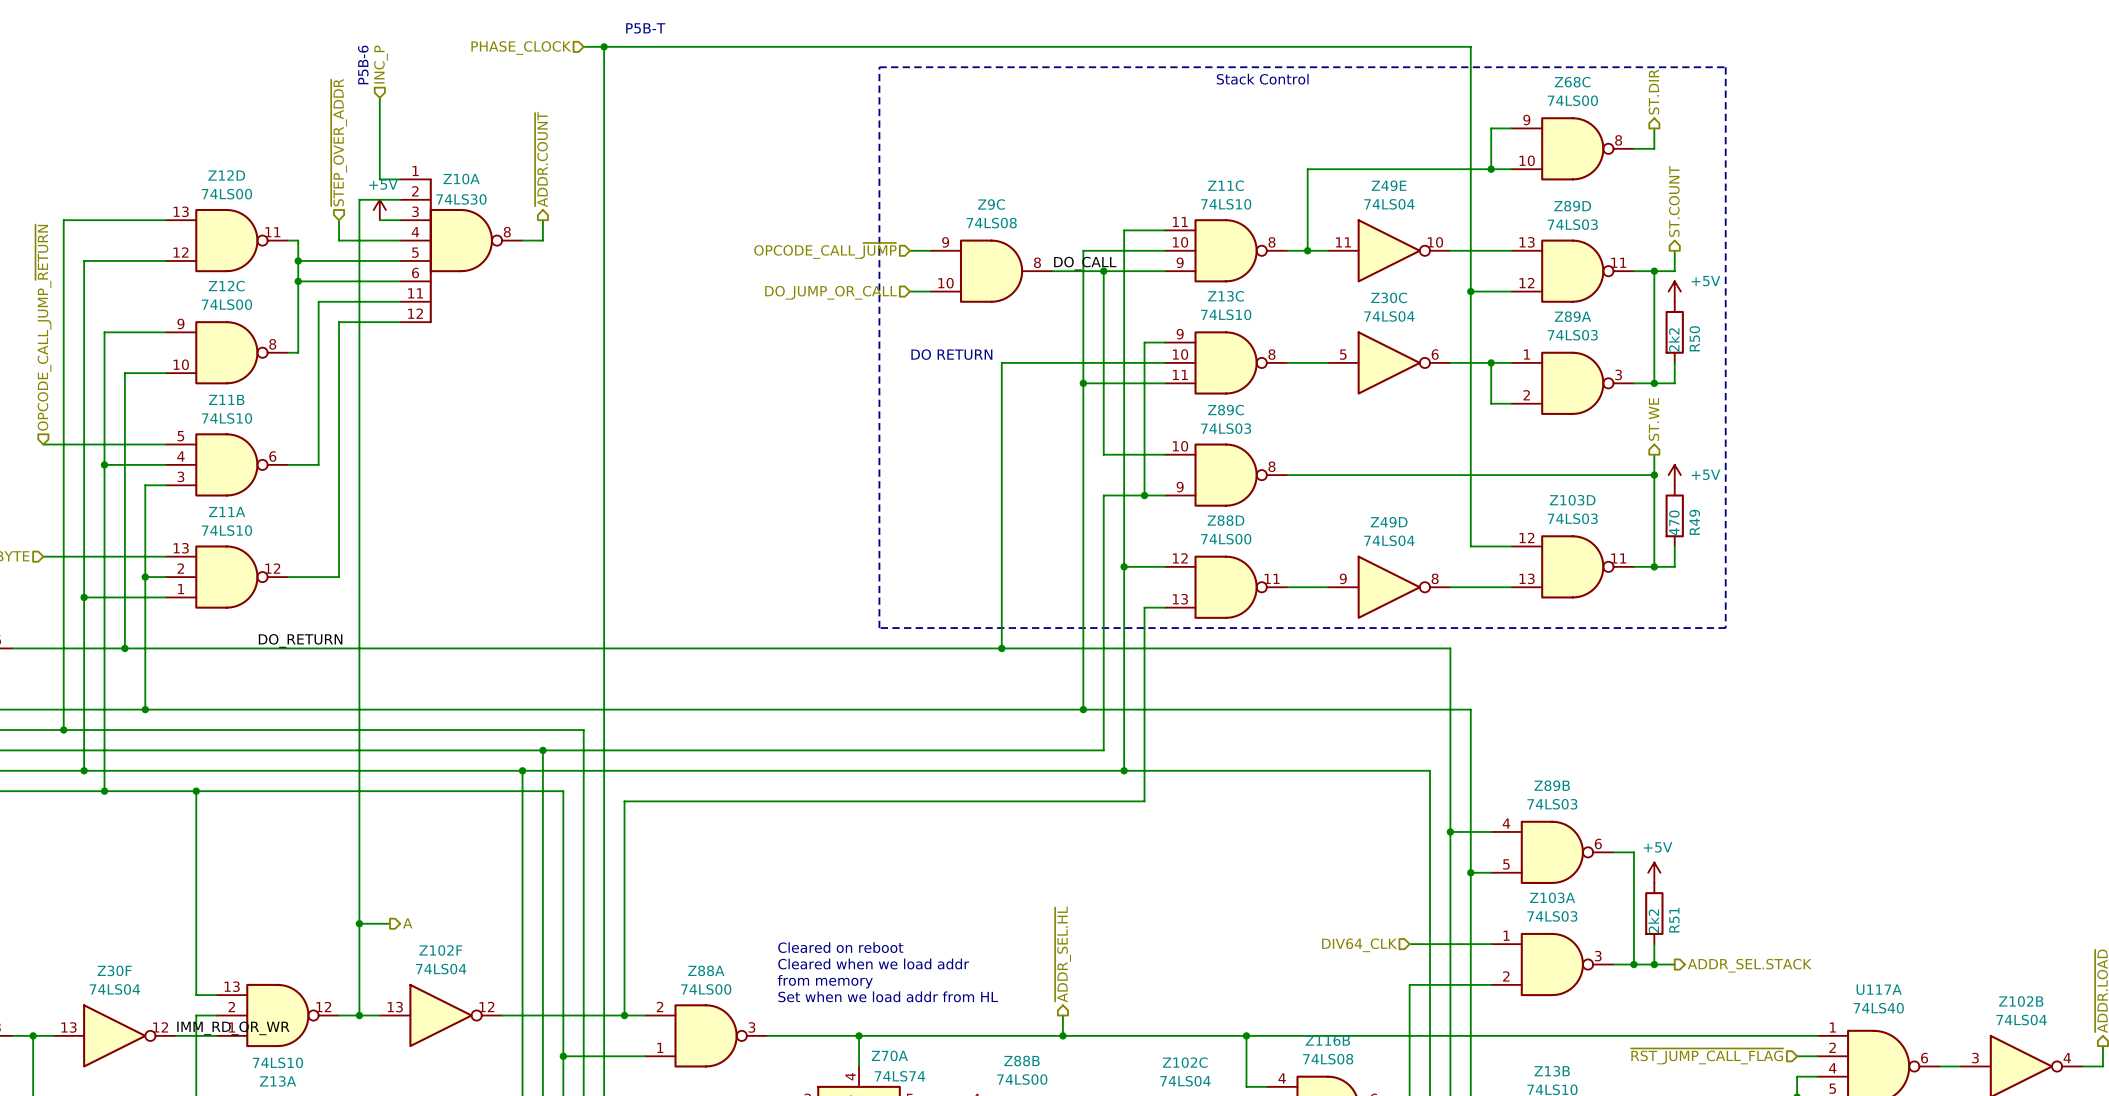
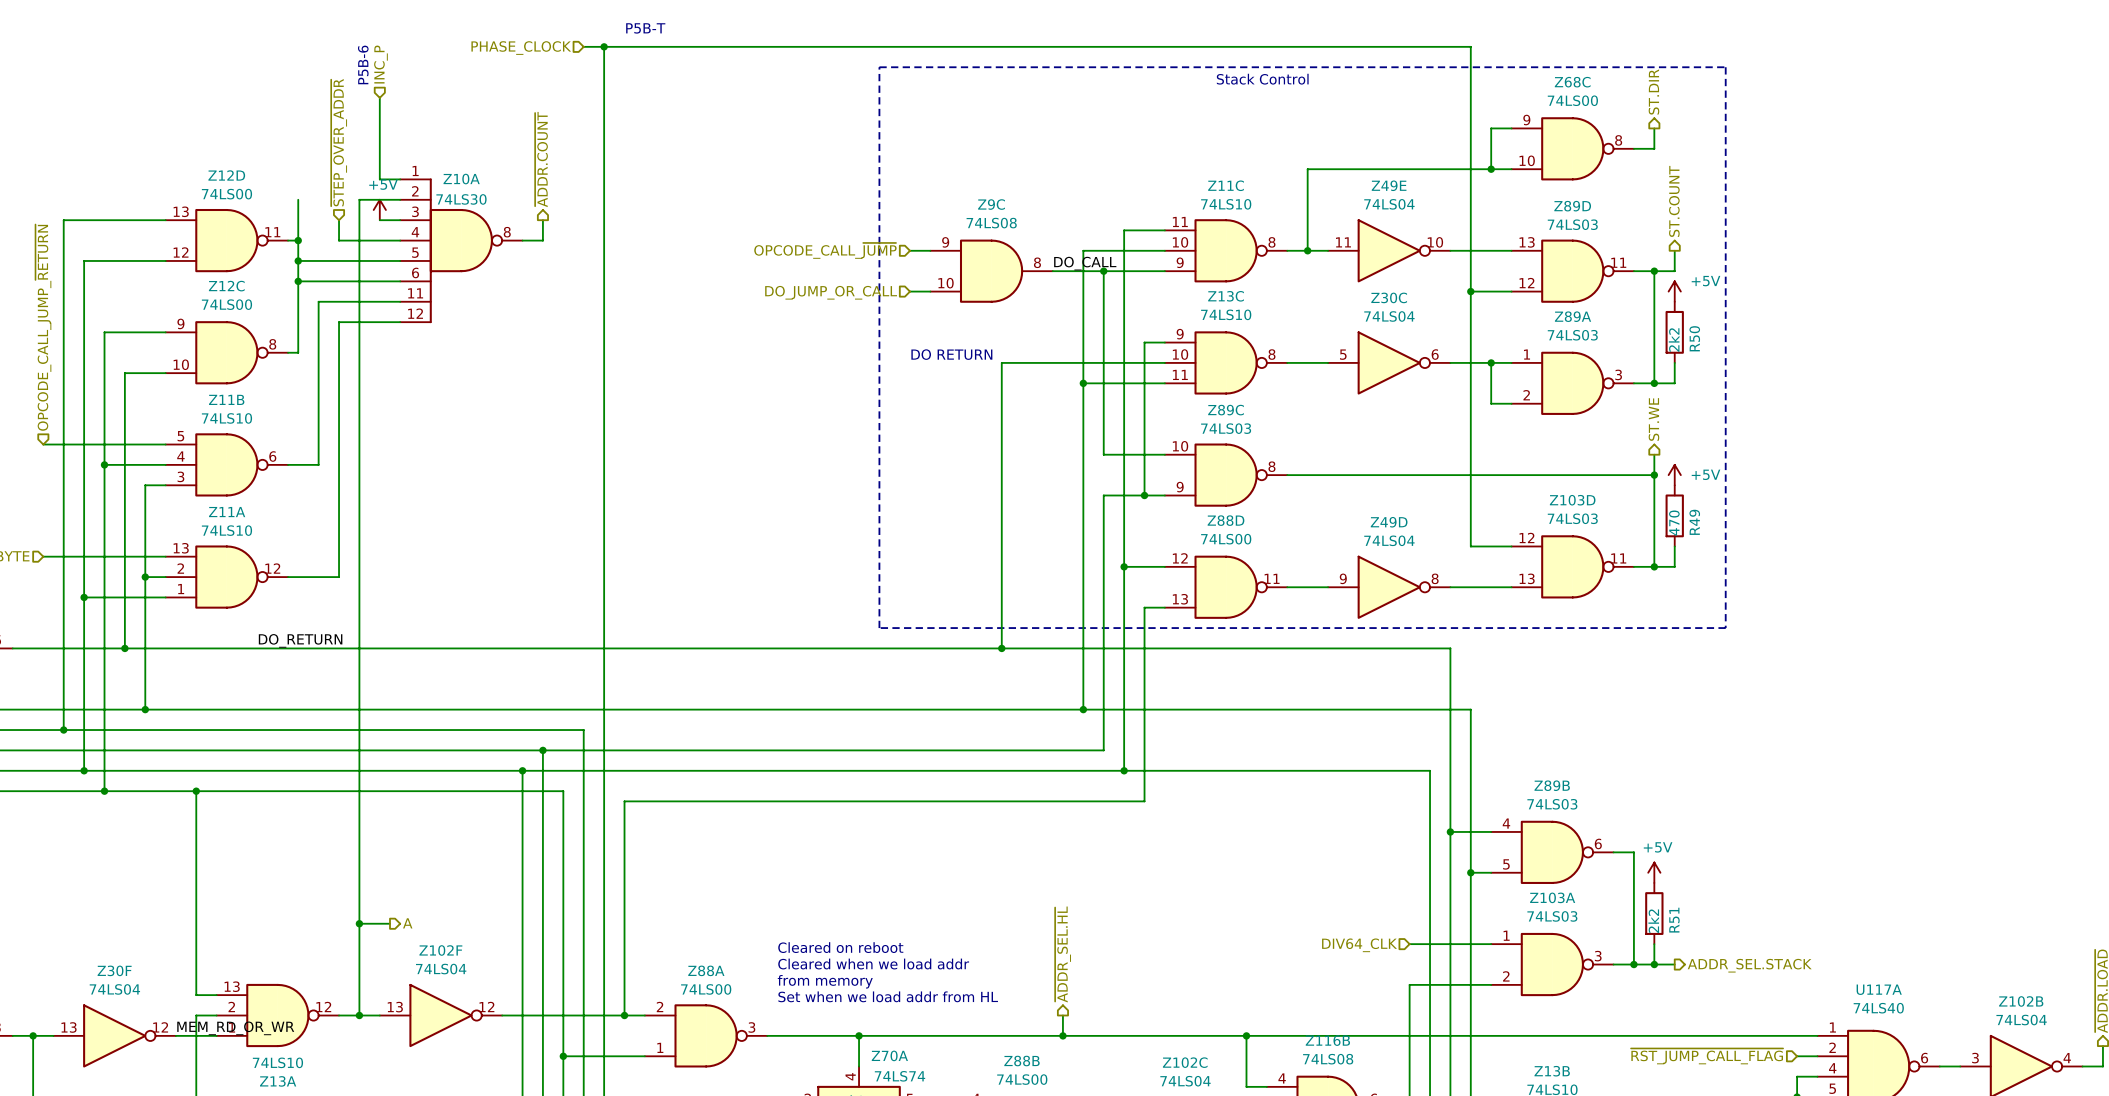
wire: none -> (298, 199) (298, 240)
junction: none -> (298, 240)
label: IMM_RD_OR_WR (233, 1028) -> MEM_RD_OR_WR (235, 1028)

